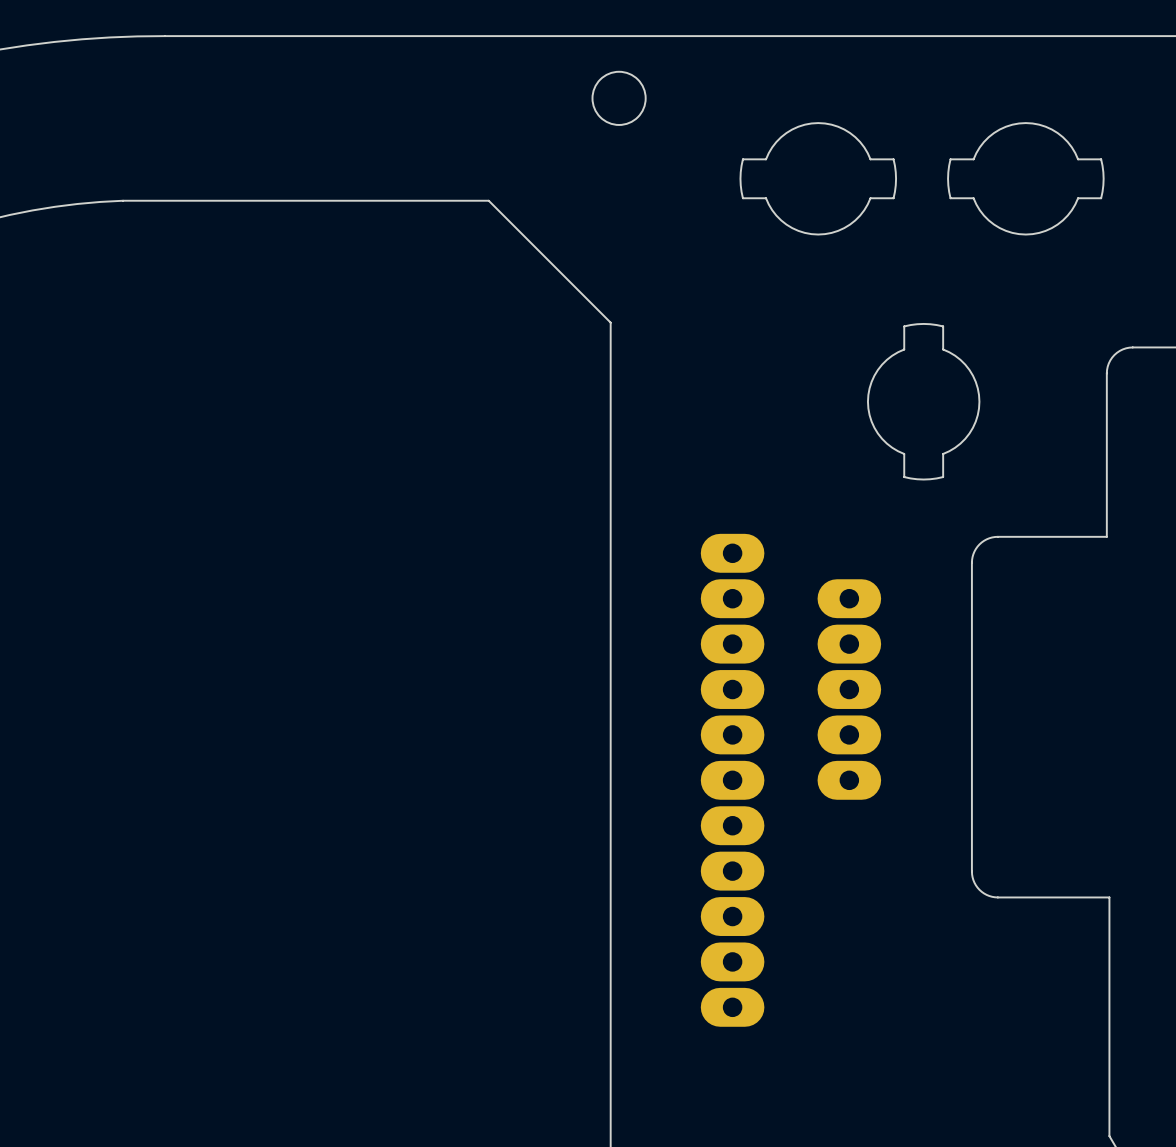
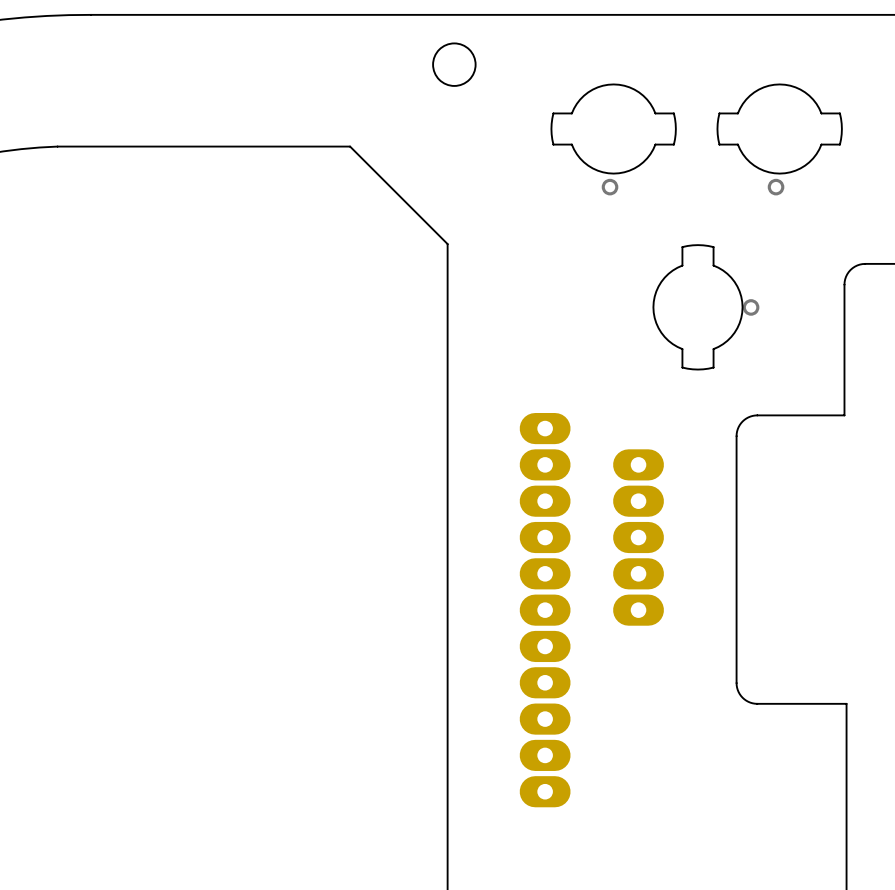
via: none -> (610, 187)
via: none -> (776, 187)
via: none -> (751, 307)

